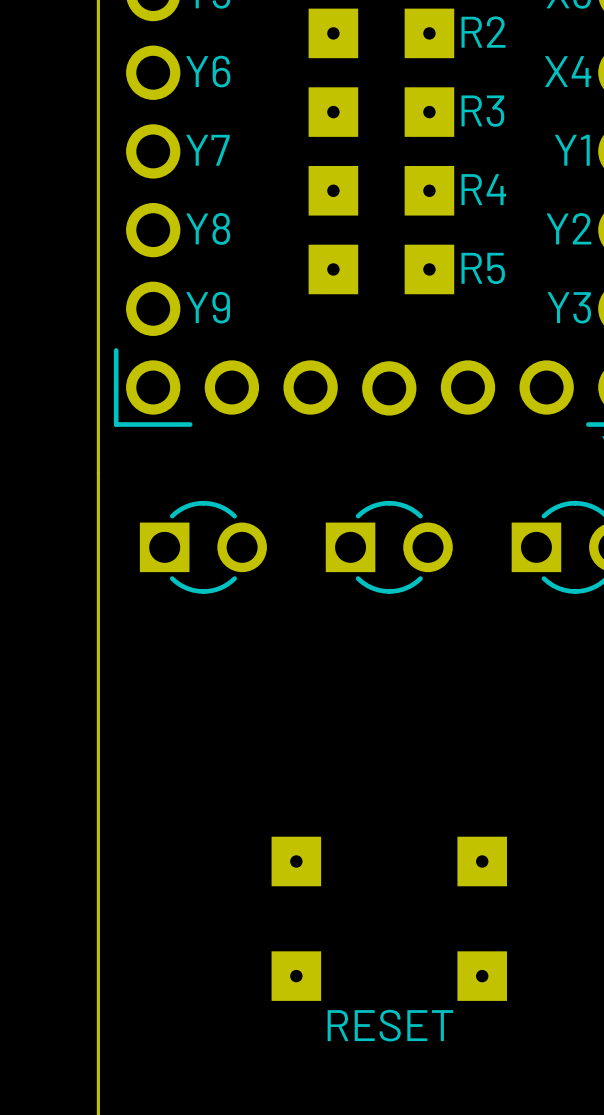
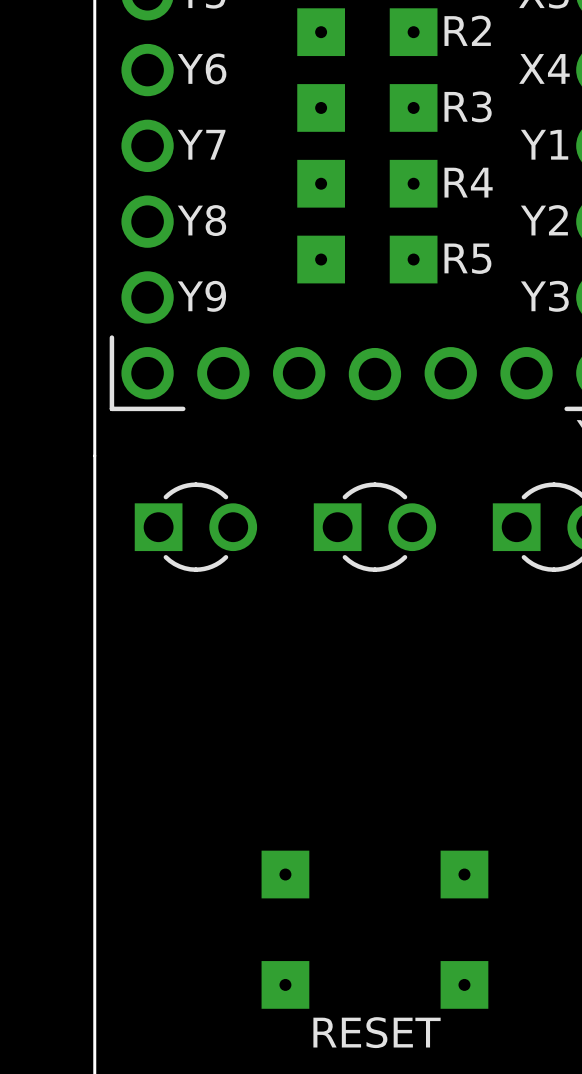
part position: (389, 918) -> (374, 929)

